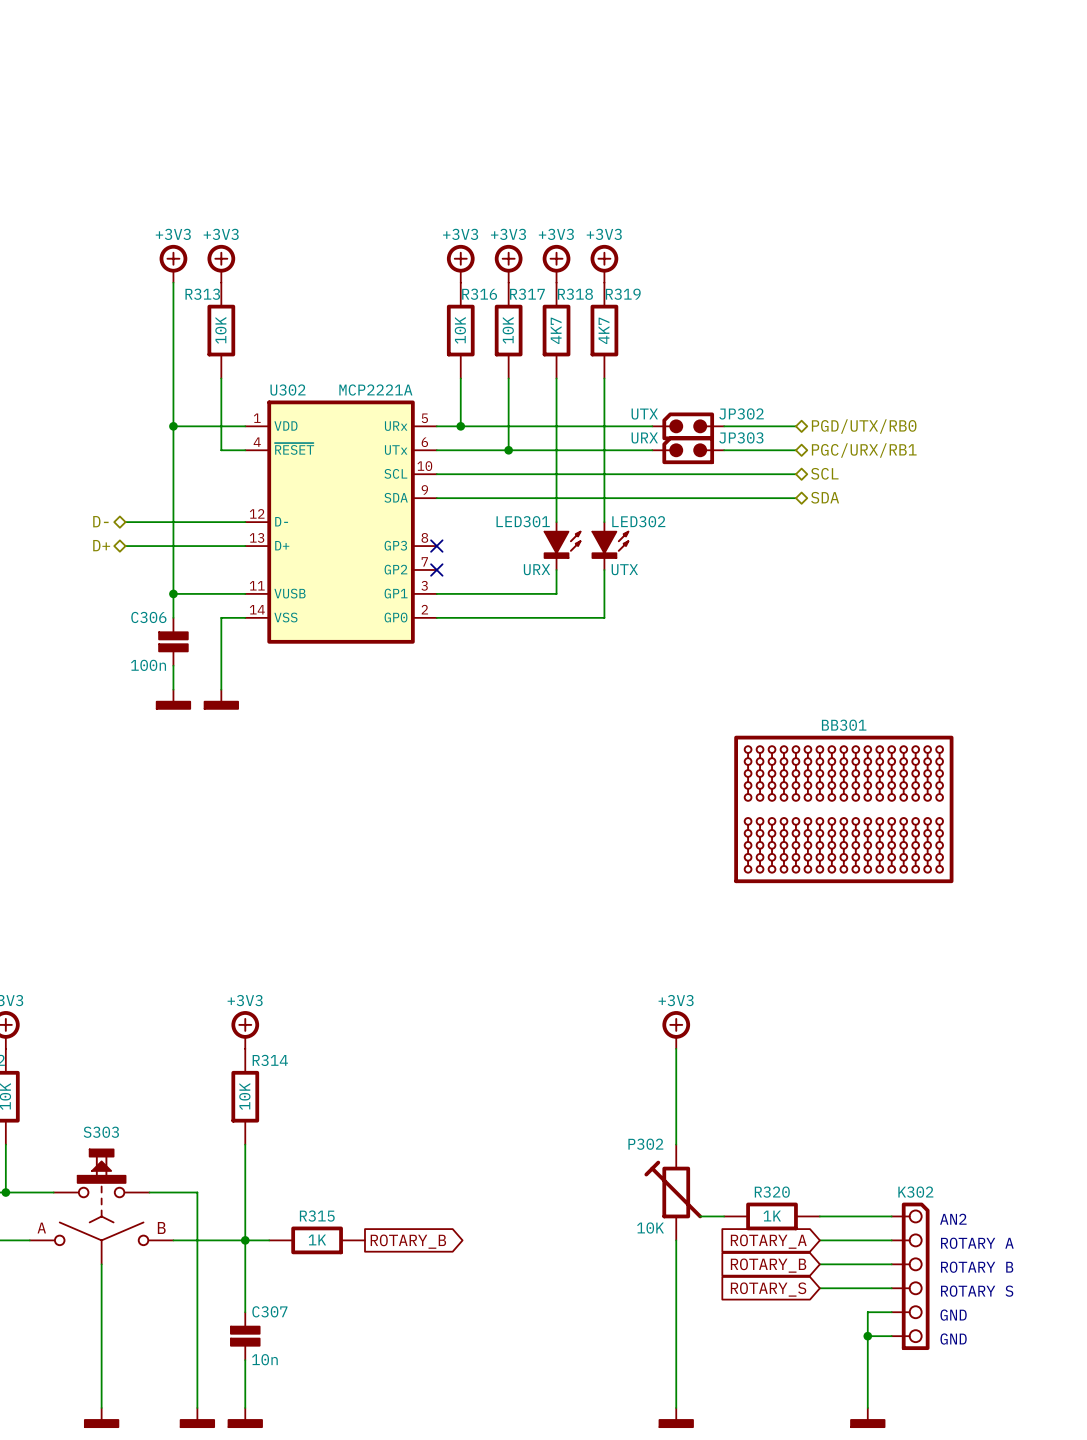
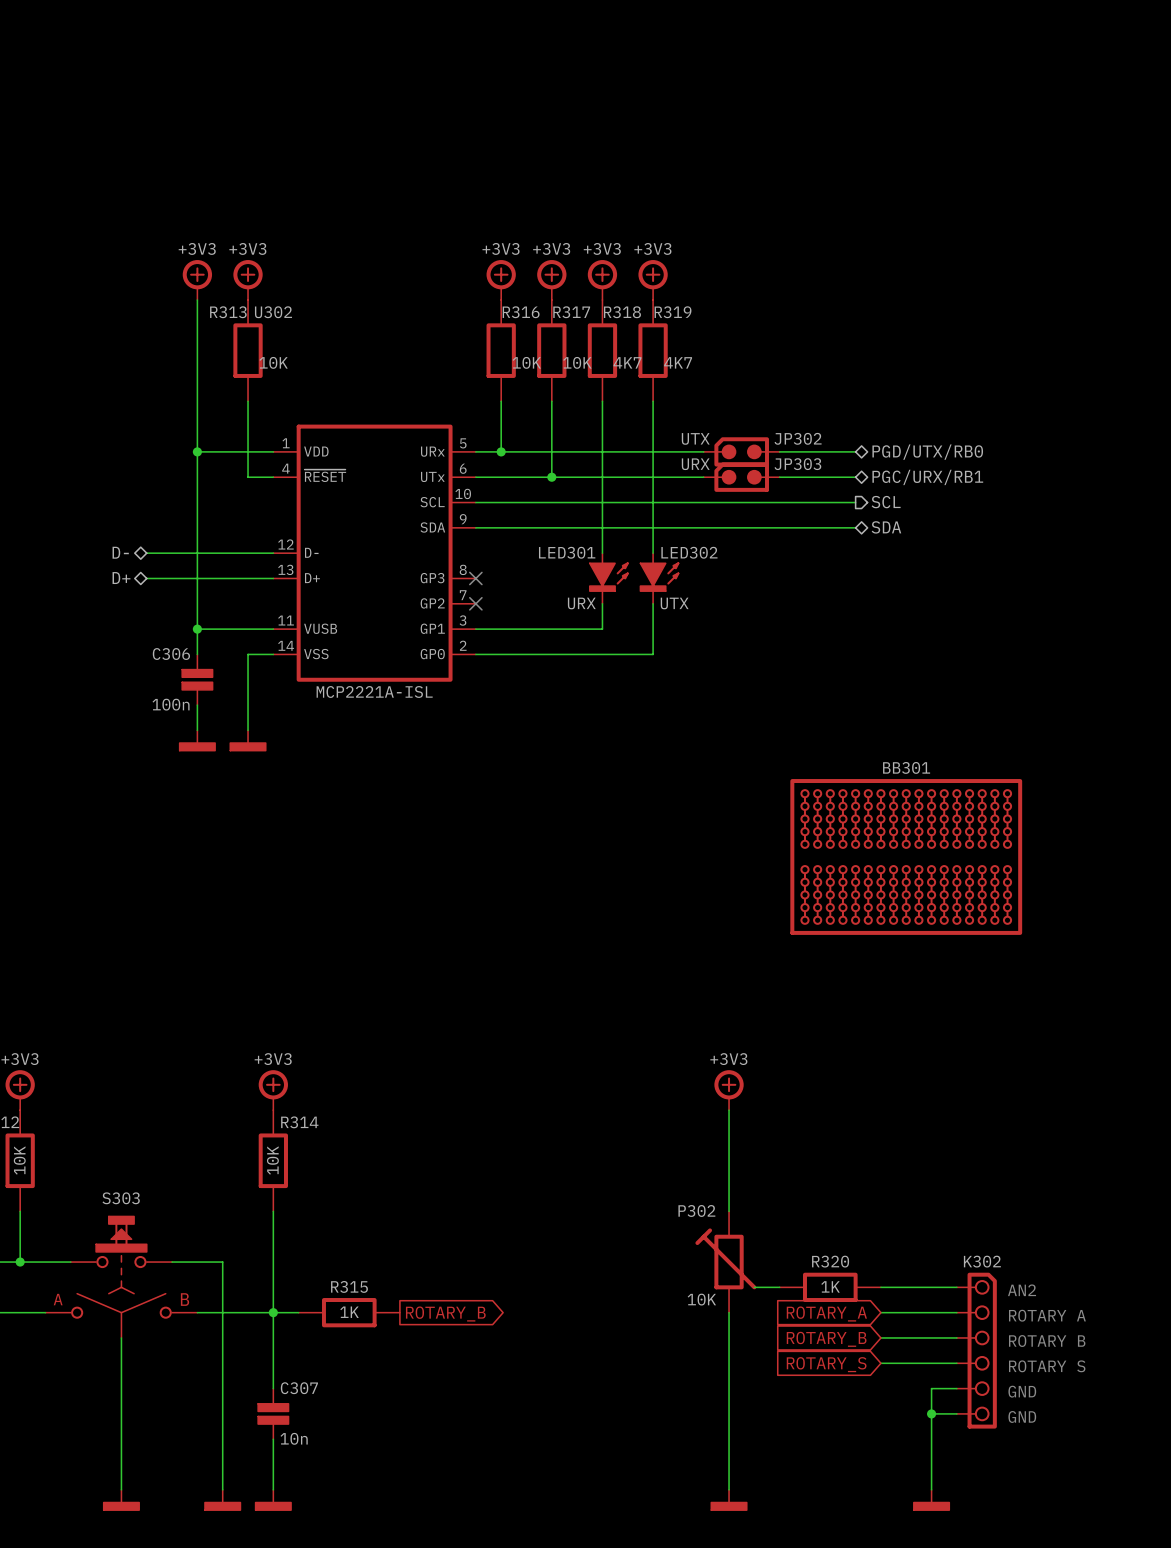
R313 value rotation: 0° (220, 330) -> 90° clockwise (273, 362)
R316 value rotation: 0° (460, 330) -> 90° clockwise (526, 362)
R317 value rotation: 0° (508, 330) -> 90° clockwise (577, 362)
R318 value rotation: 0° (556, 330) -> 90° clockwise (627, 362)
R319 value rotation: 0° (604, 330) -> 90° clockwise (678, 362)
U302 name position: U302 (287, 390) -> U302 (273, 312)
U302 value: MCP2221A (375, 390) -> MCP2221A-ISL (374, 691)
hierarchical label shape: bidirectional (824, 473) -> output (886, 502)

